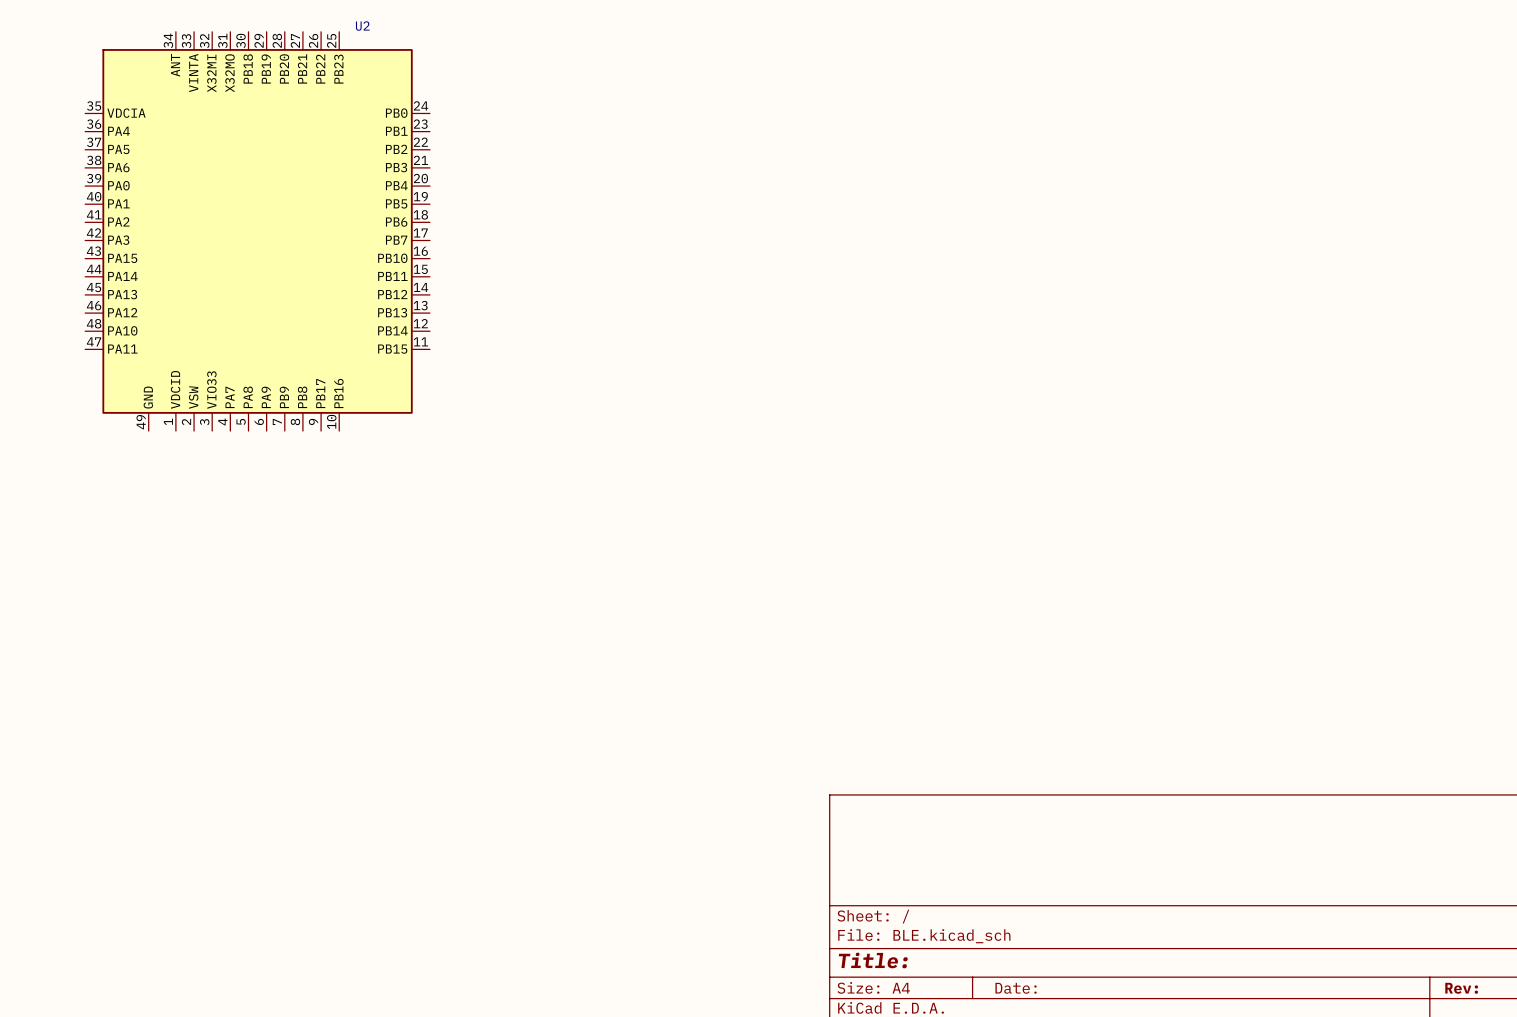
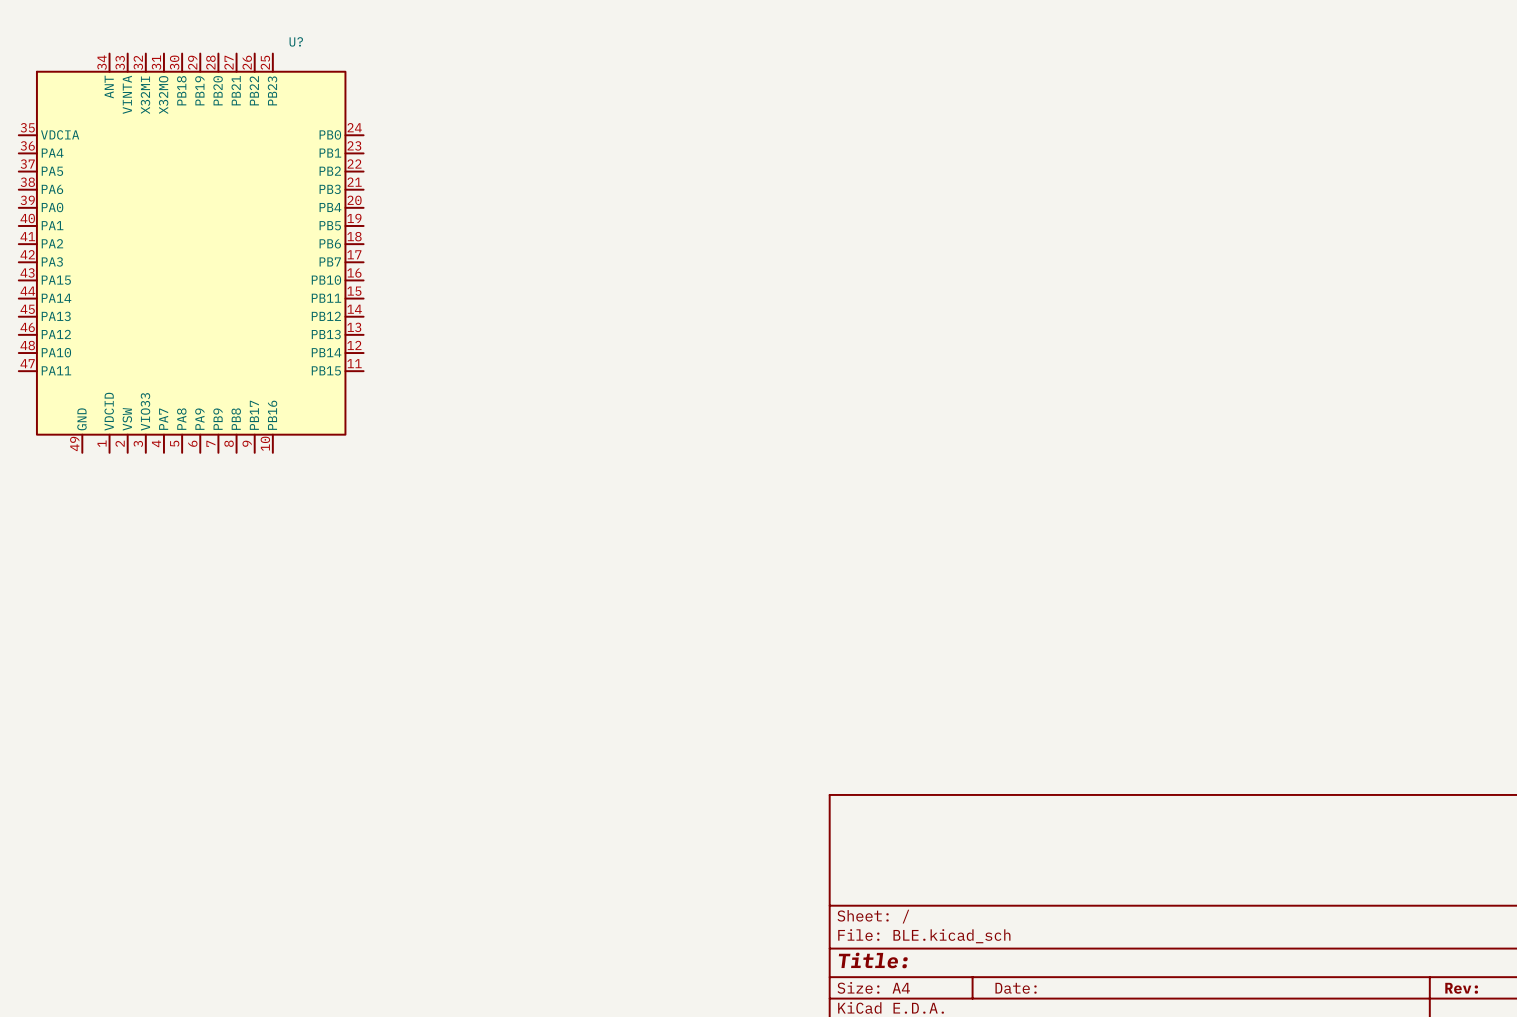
U2: (257, 231) -> none
U?: none -> (191, 253)

